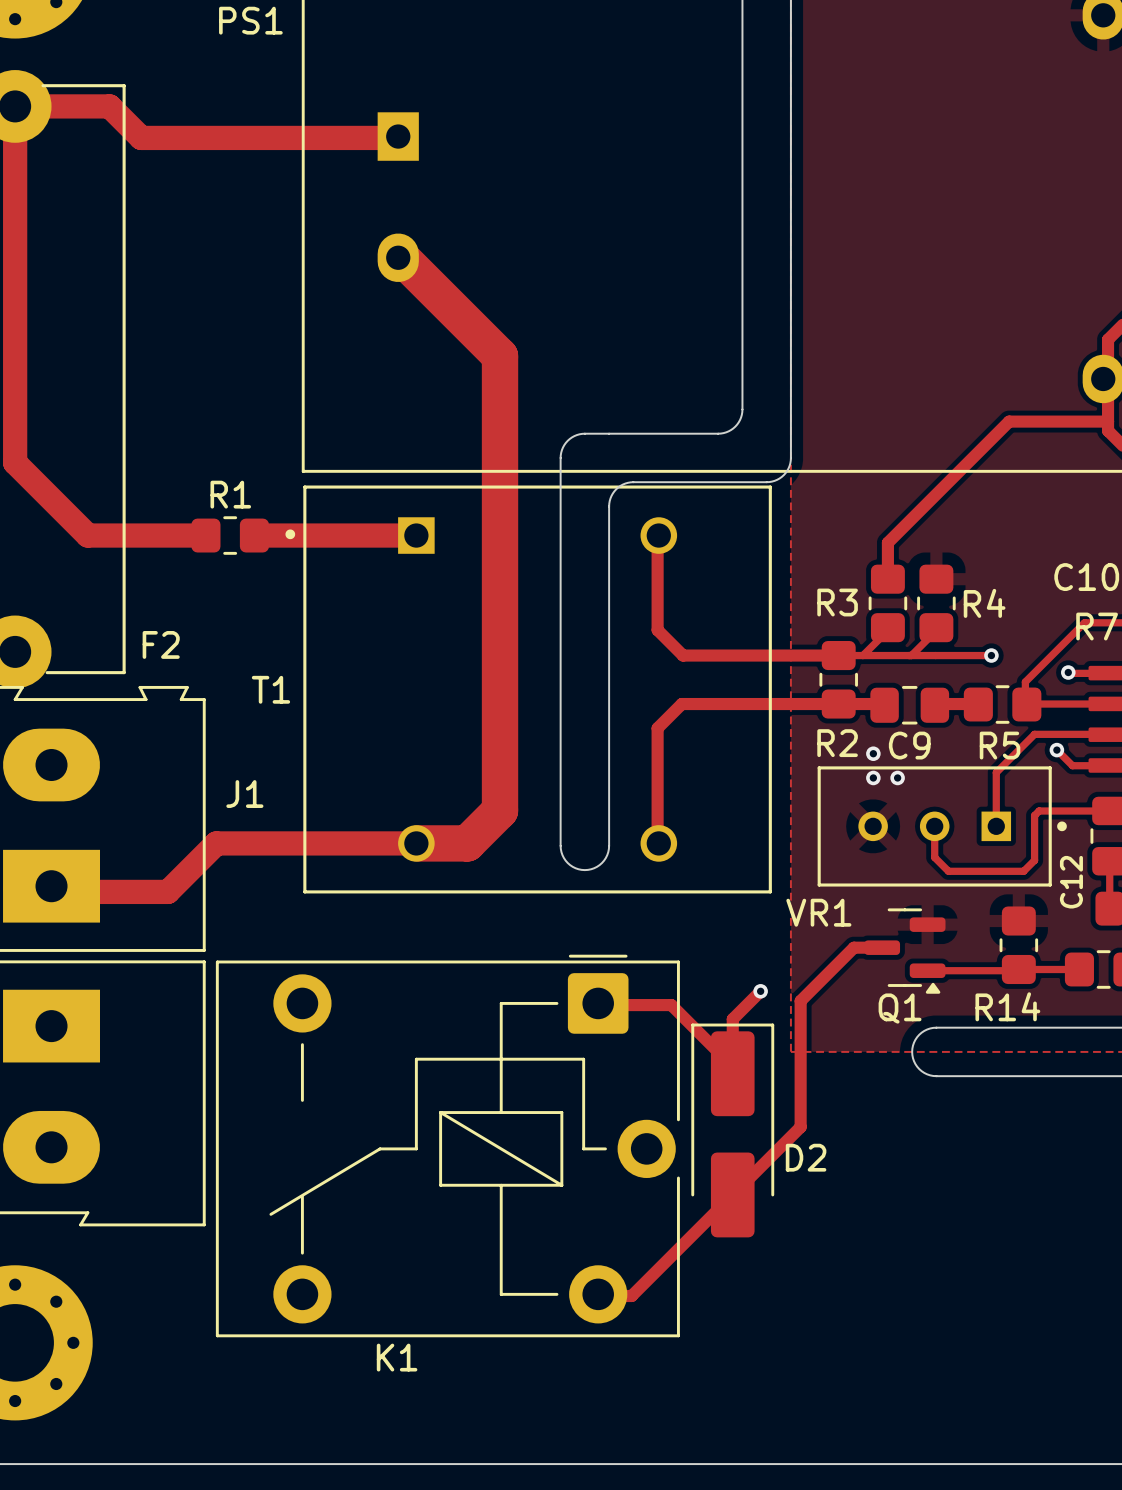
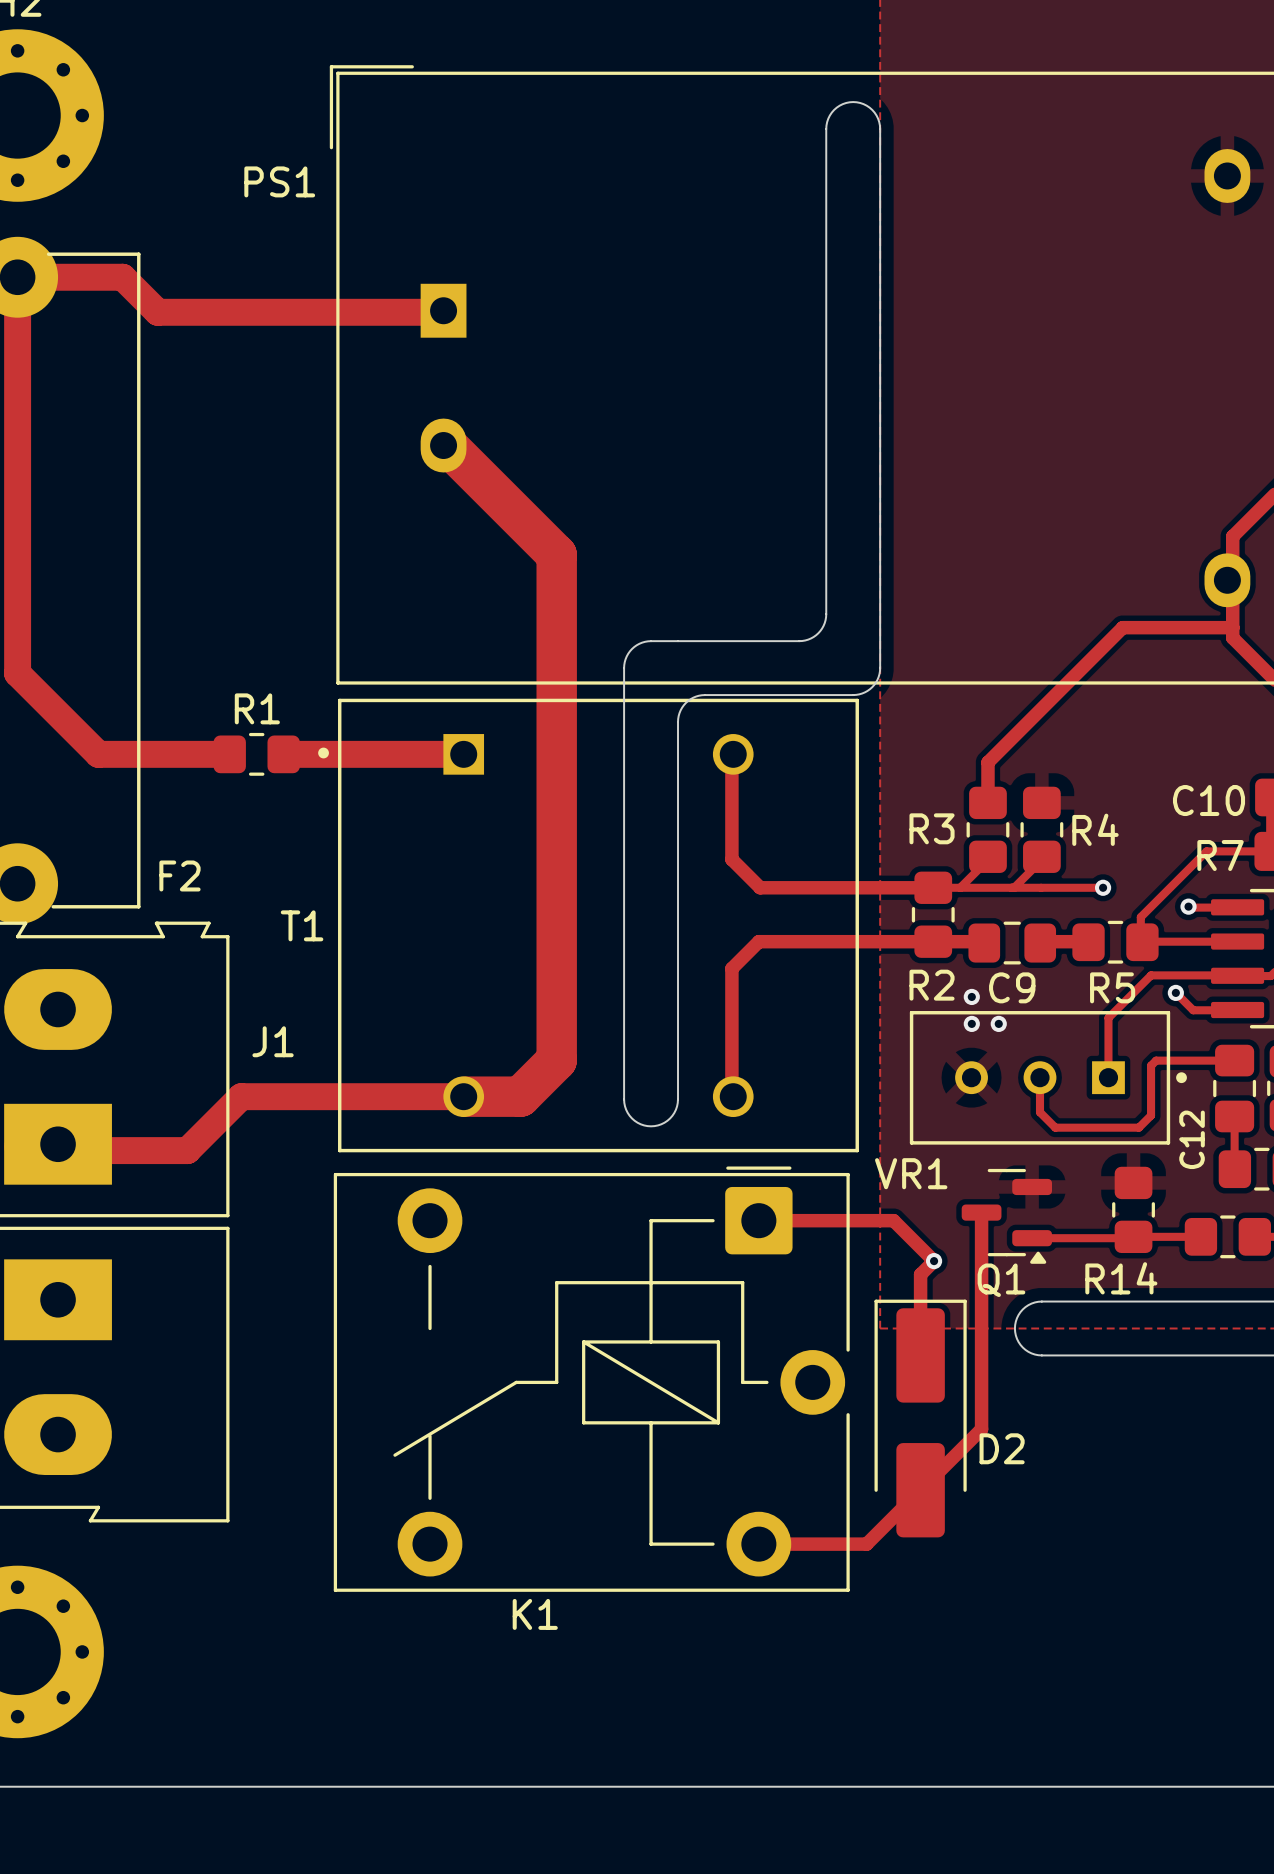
track: (882, 947) (853, 947) (800, 1001) (800, 1127) (631, 1296) (578, 1296) -> (981, 1212) (981, 1429) (866, 1544) (758, 1544)
track: none -> (758, 1220) (893, 1220) (934, 1261) (920, 1274) (920, 1355)
track: (760, 991) (732, 1019) (732, 1073) -> none
via position: (760, 991) -> (934, 1261)
track: (577, 1005) (671, 1005) (734, 1068) -> none
D2 position: (732, 1130) -> (920, 1418)
K1 position: (447, 1145) -> (591, 1379)

